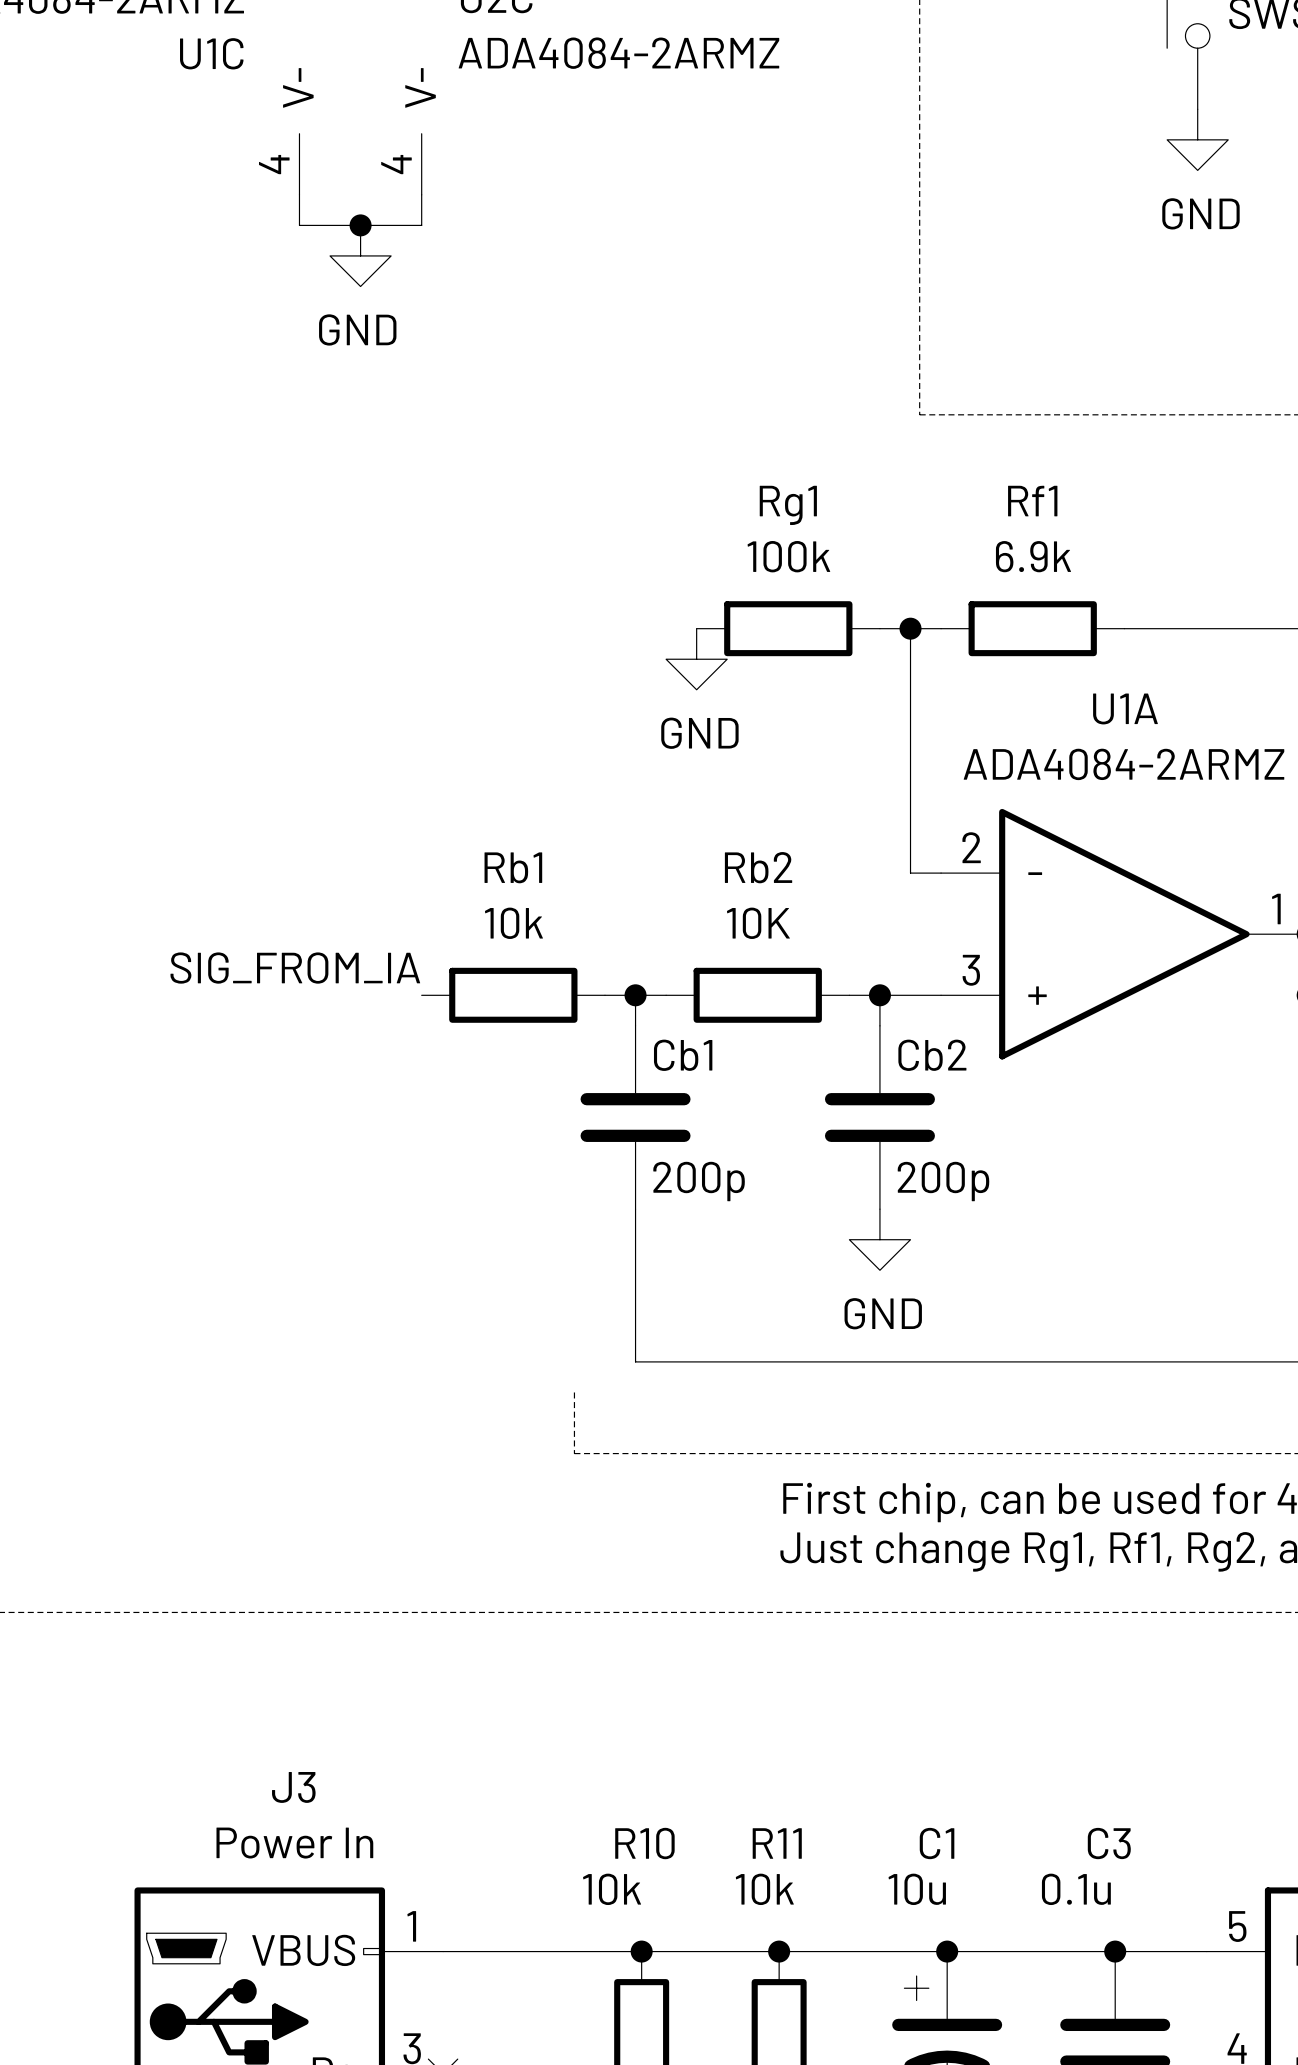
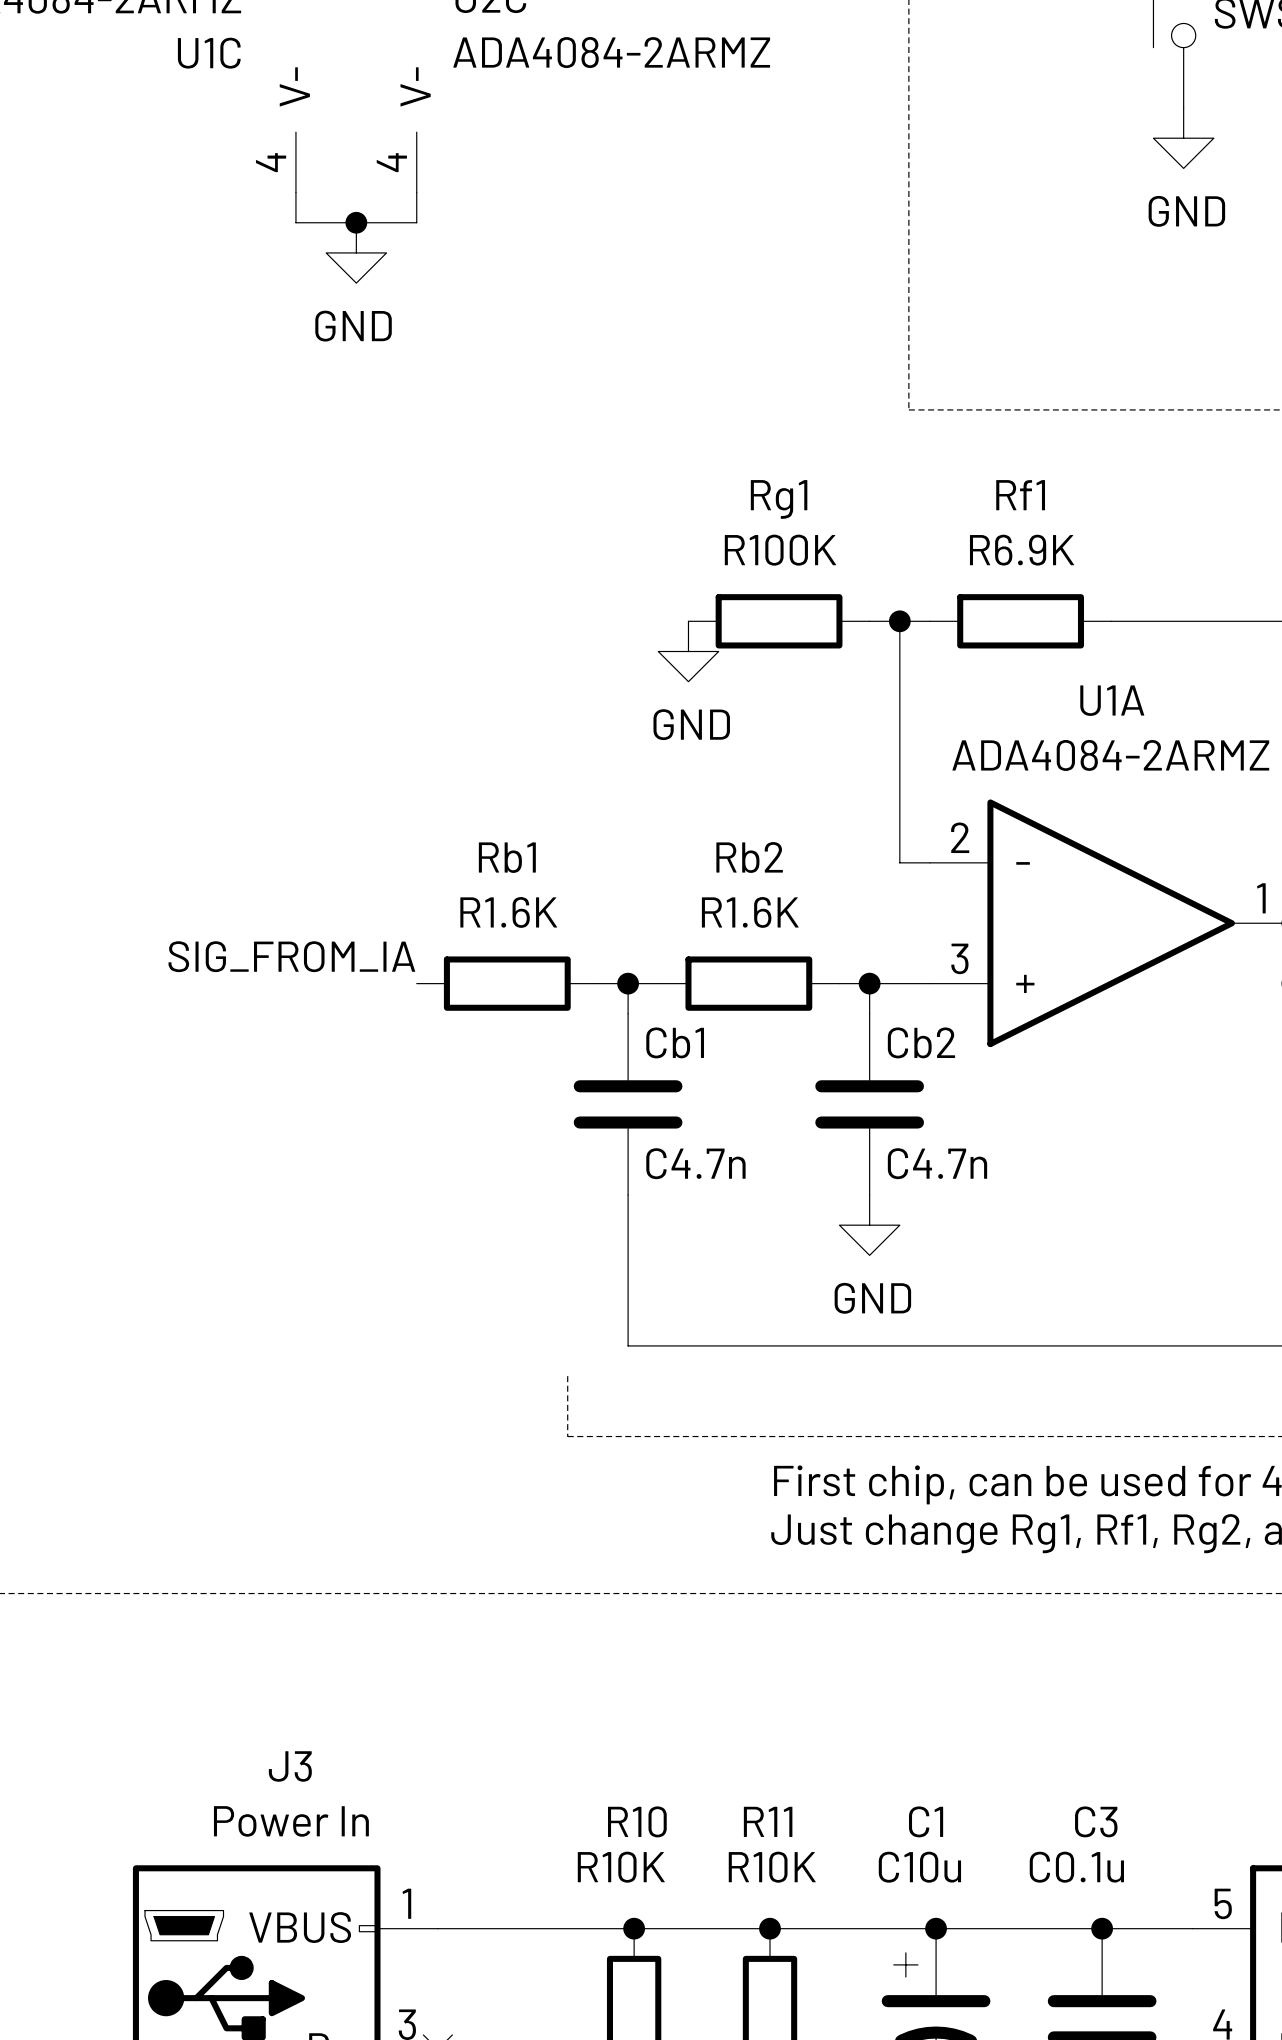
Rg1 value: 100k (788, 556) -> R100K (780, 550)
Rf1 value: 6.9k (1033, 556) -> R6.9K (1022, 550)
Rb1 value: 10k (513, 923) -> R1.6K (508, 912)
Rb2 value: 10K (758, 923) -> R1.6K (750, 912)
Cb1 value: 200p (699, 1181) -> C4.7n (695, 1163)
Cb2 value: 200p (943, 1181) -> C4.7n (937, 1163)
R10 value: 10k (612, 1889) -> R10K (621, 1867)
R11 value: 10k (764, 1889) -> R10K (772, 1867)
C1 value: 10u (917, 1889) -> C10u (919, 1867)
C3 value: 0.1u (1076, 1889) -> C0.1u (1076, 1867)

